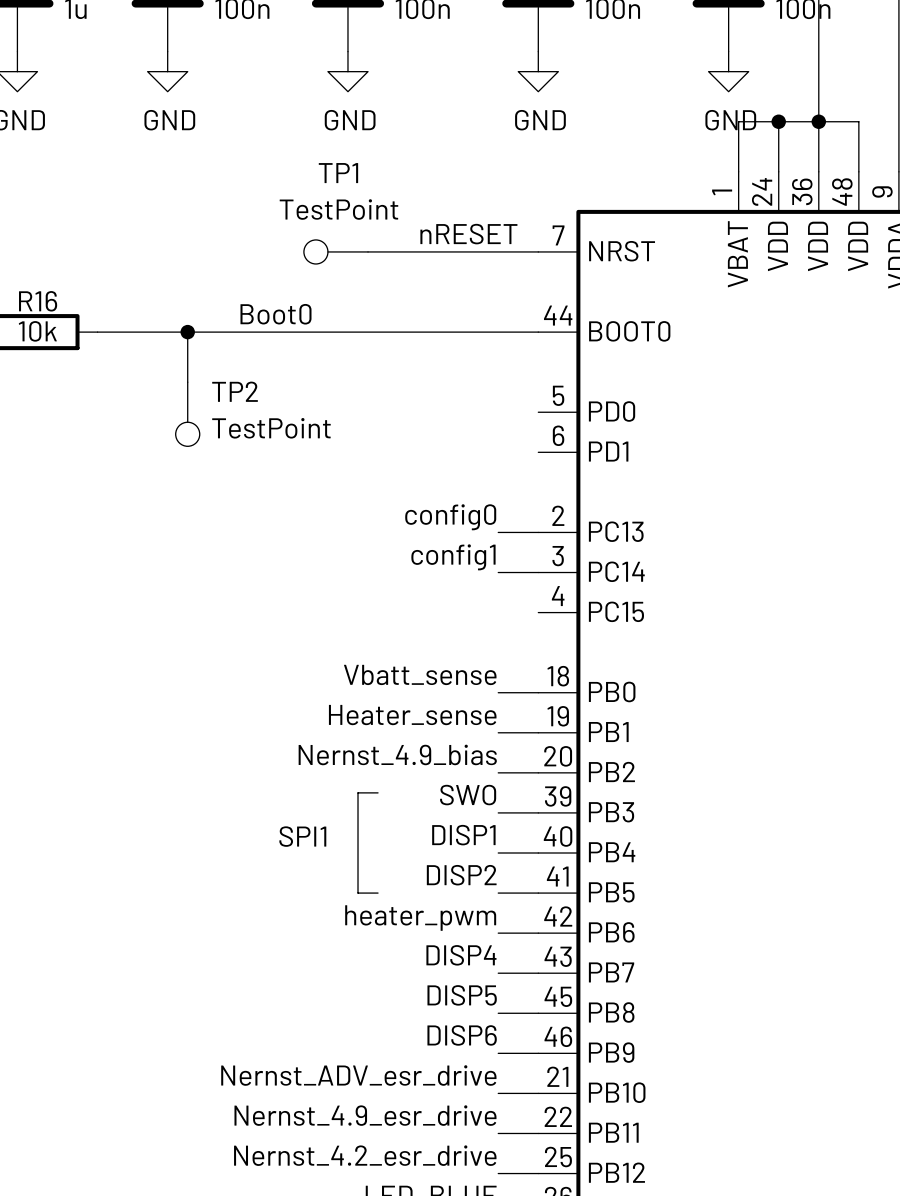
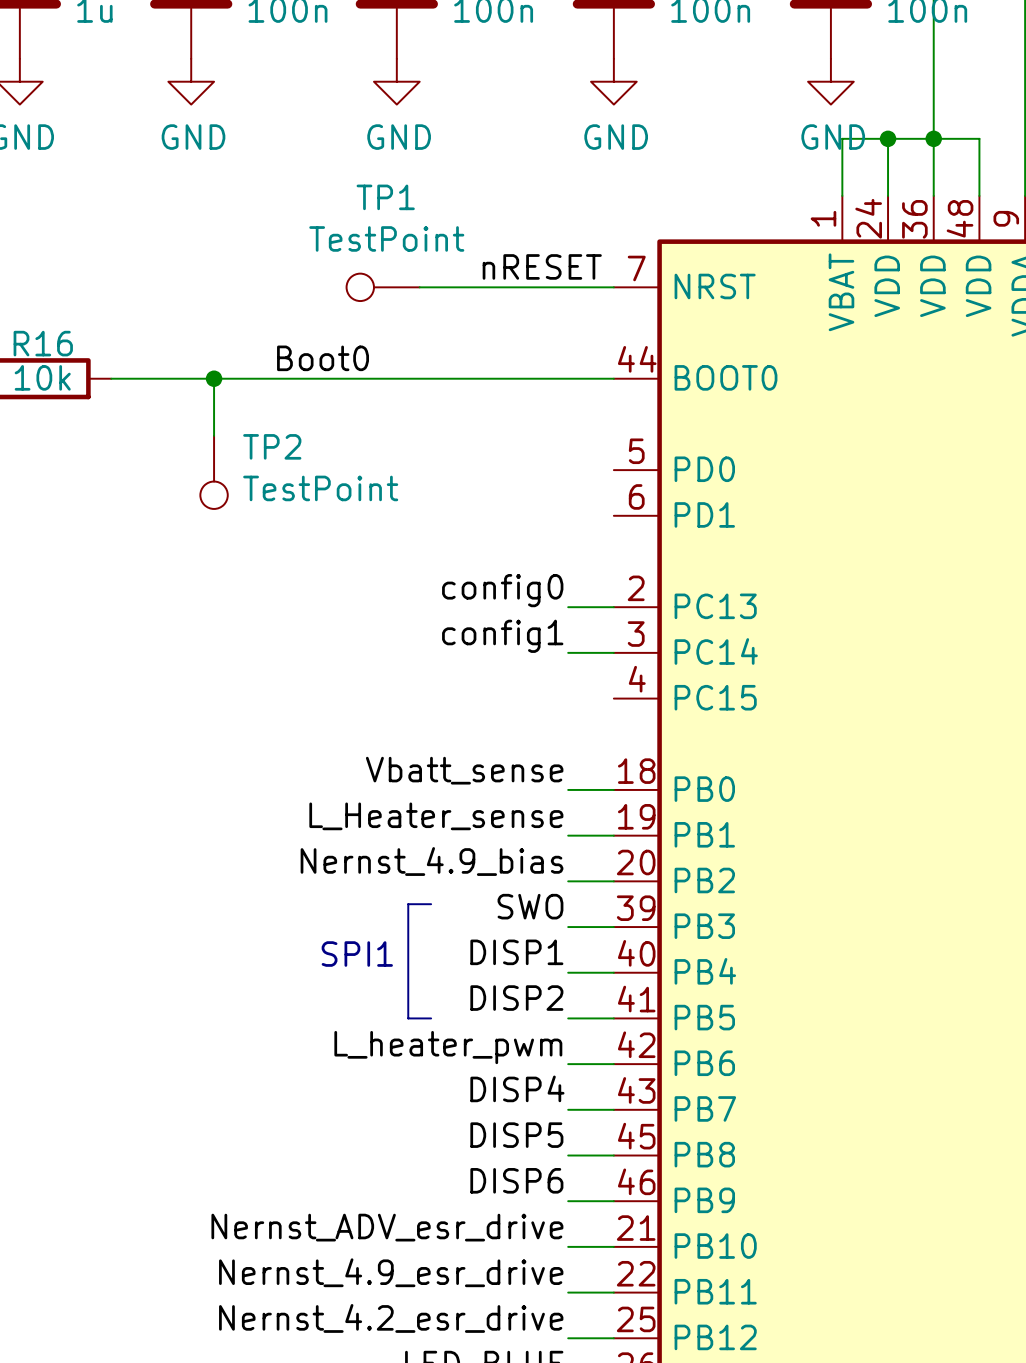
label: Heater_sense (412, 715) -> L_Heater_sense (436, 816)
label: heater_pwm (420, 918) -> L_heater_pwm (448, 1047)

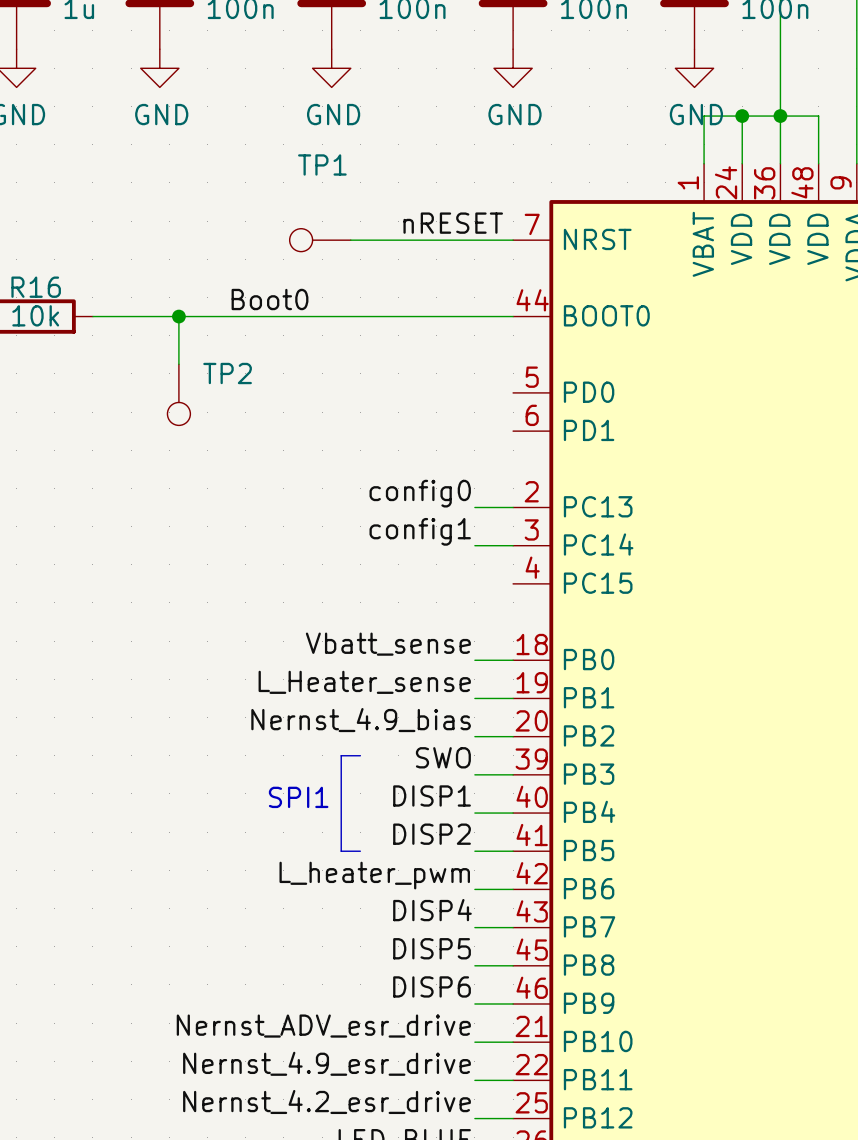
TP1 value: TestPoint (386, 238) -> none
TP2 value: TestPoint (320, 488) -> none

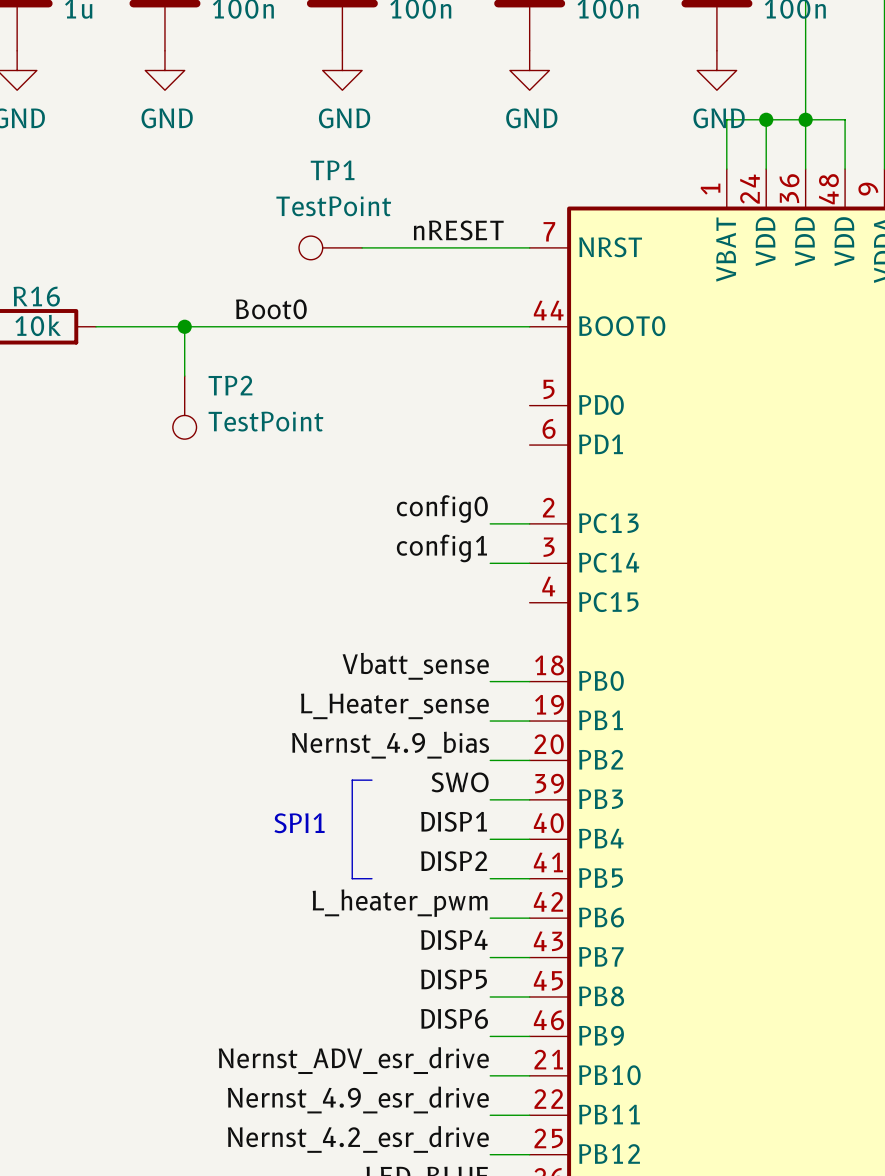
TP1 value: none -> TestPoint (333, 206)
TP2 value: none -> TestPoint (265, 421)

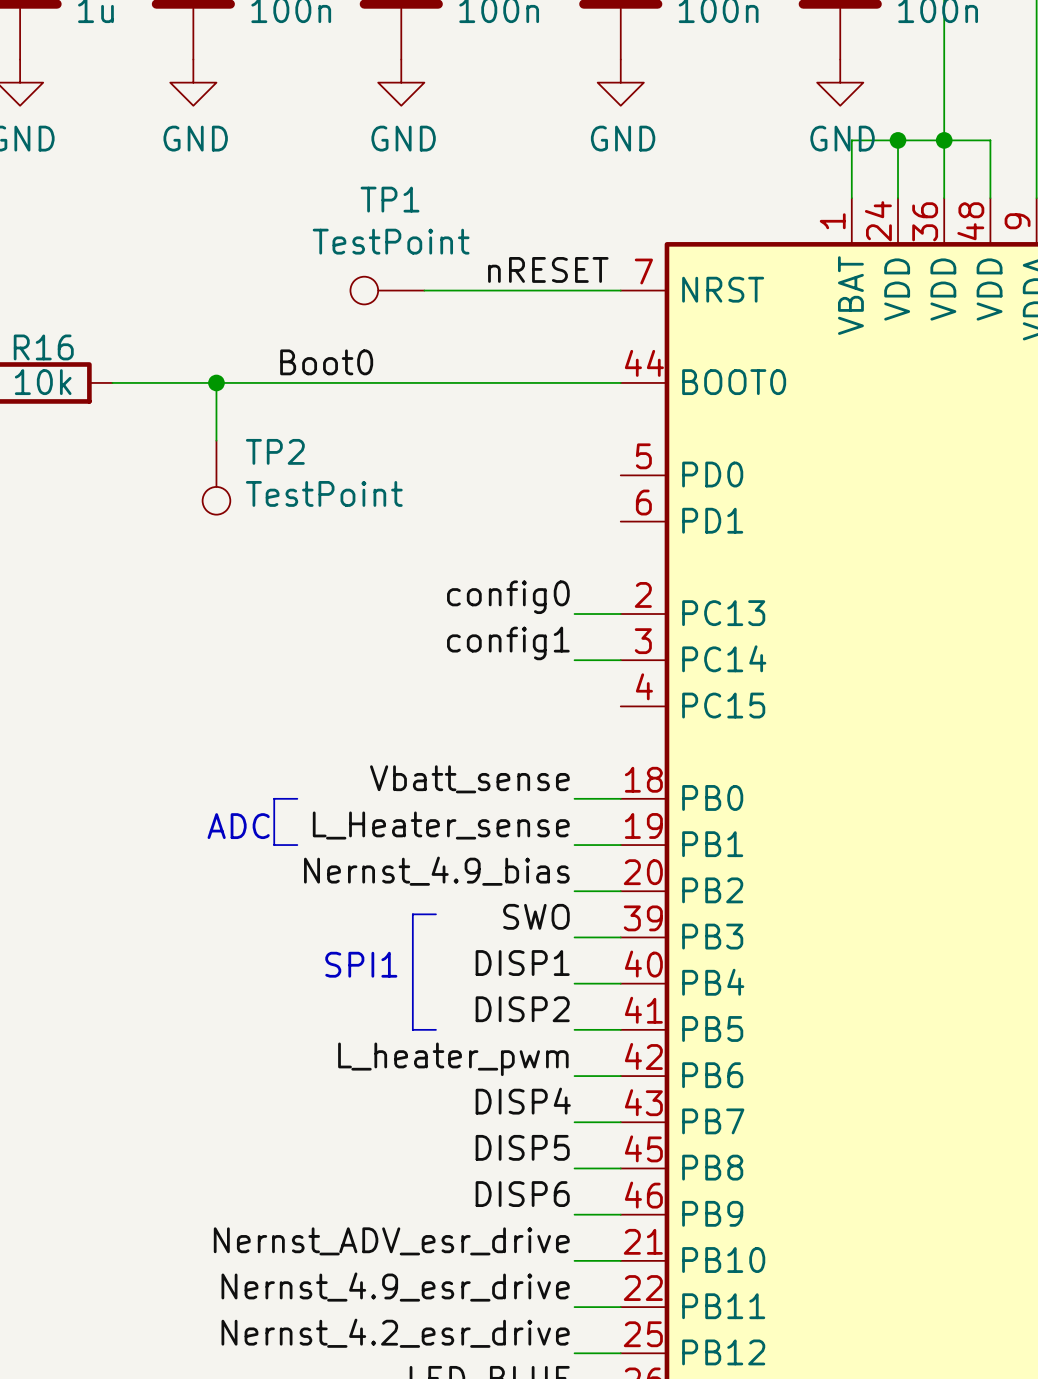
line: none -> (297, 798) (274, 798) (274, 845) (297, 845)
text: none -> ADC (238, 826)

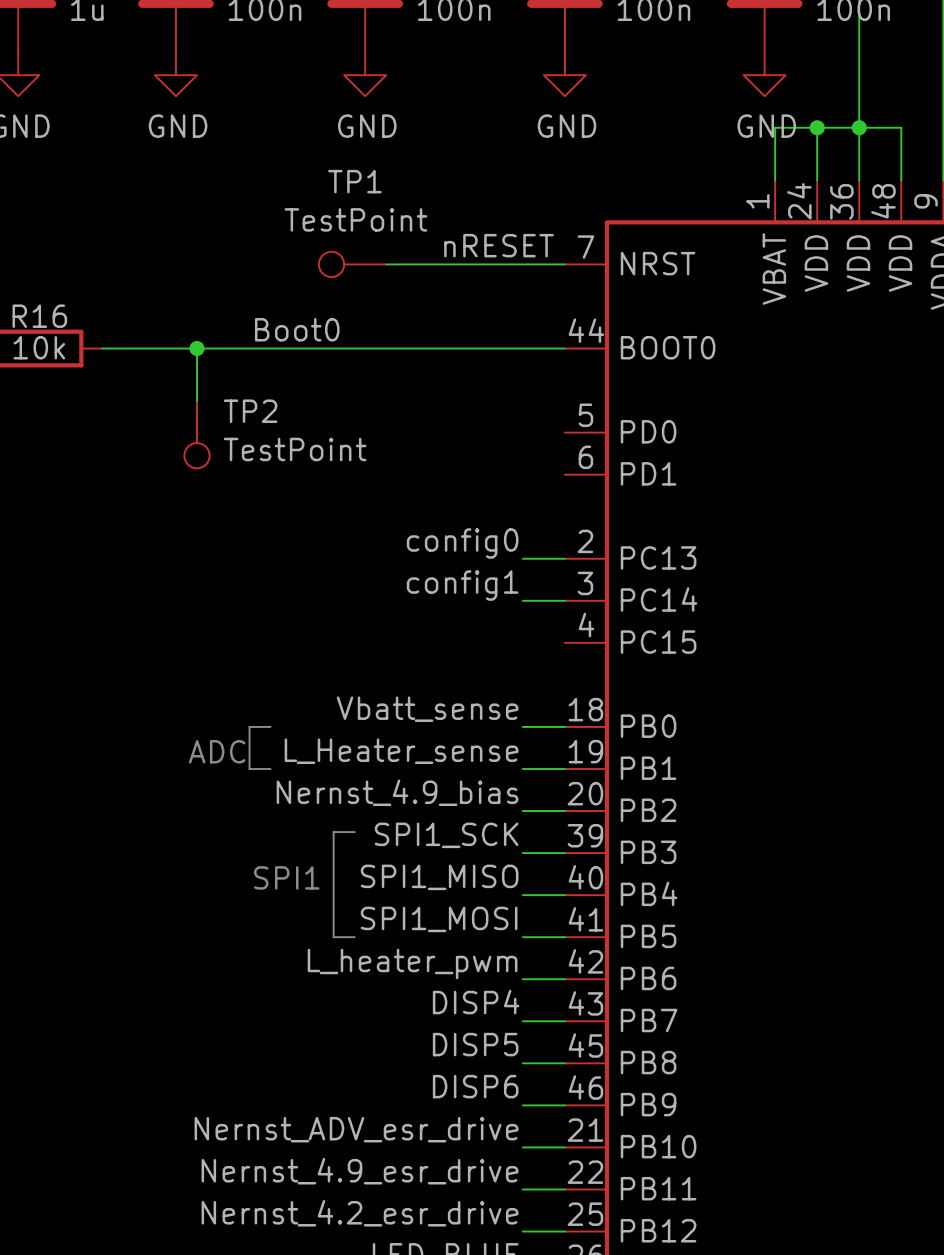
line: (435, 914) (412, 914) (412, 1029) (435, 1029) -> (354, 832) (333, 832) (333, 937) (354, 937)
label: SWO (536, 916) -> SPI1_SCK (446, 835)
label: DISP1 (522, 963) -> SPI1_MISO (439, 877)
text position: SPI1 (361, 964) -> SPI1 (286, 877)
label: DISP2 (522, 1009) -> SPI1_MOSI (439, 919)

